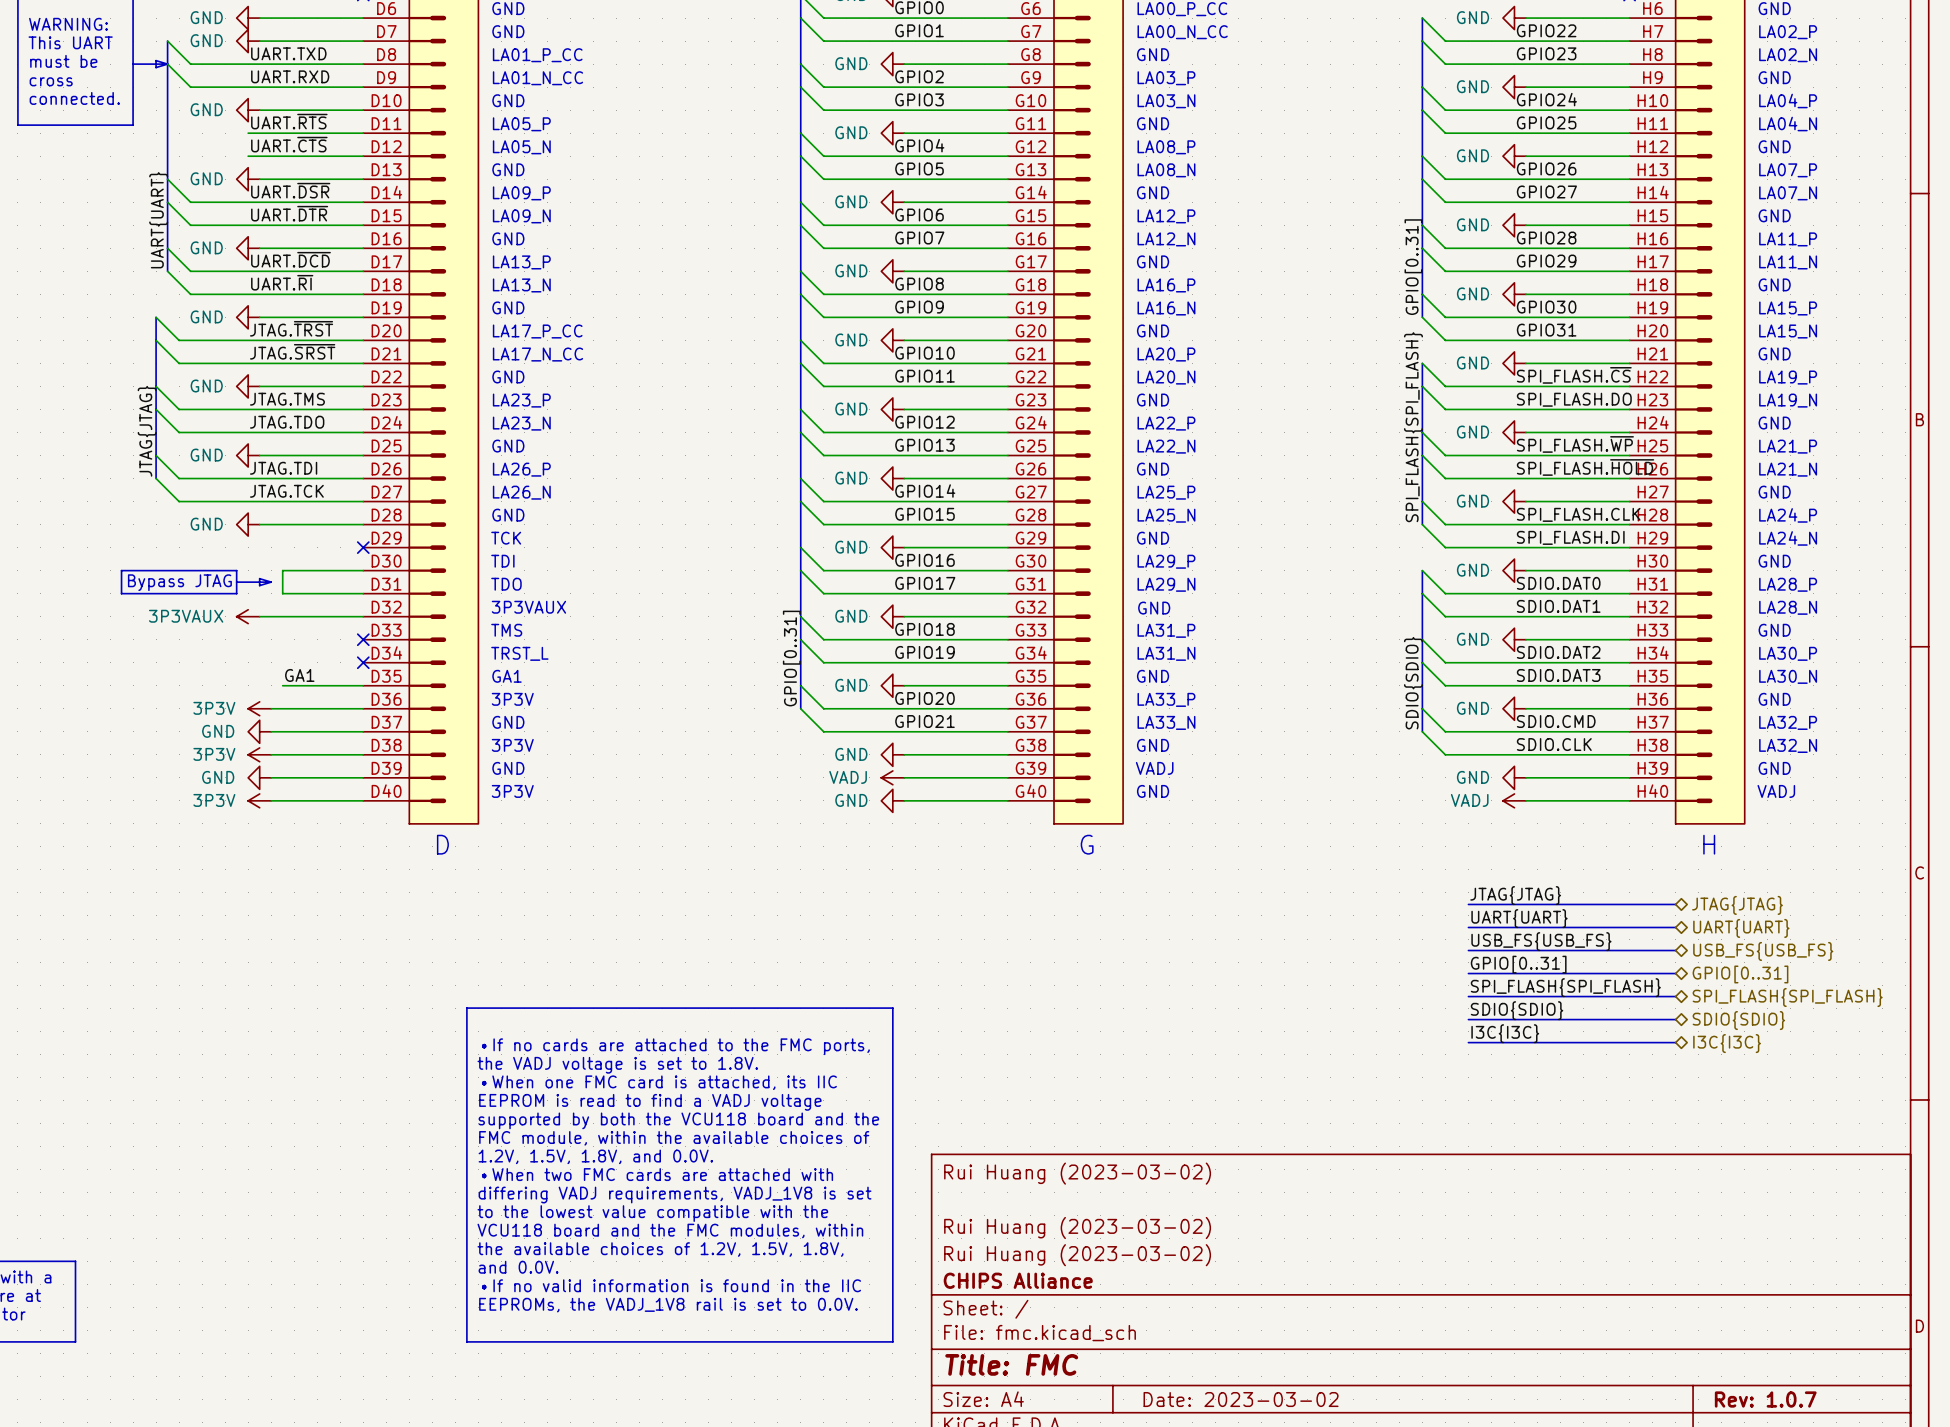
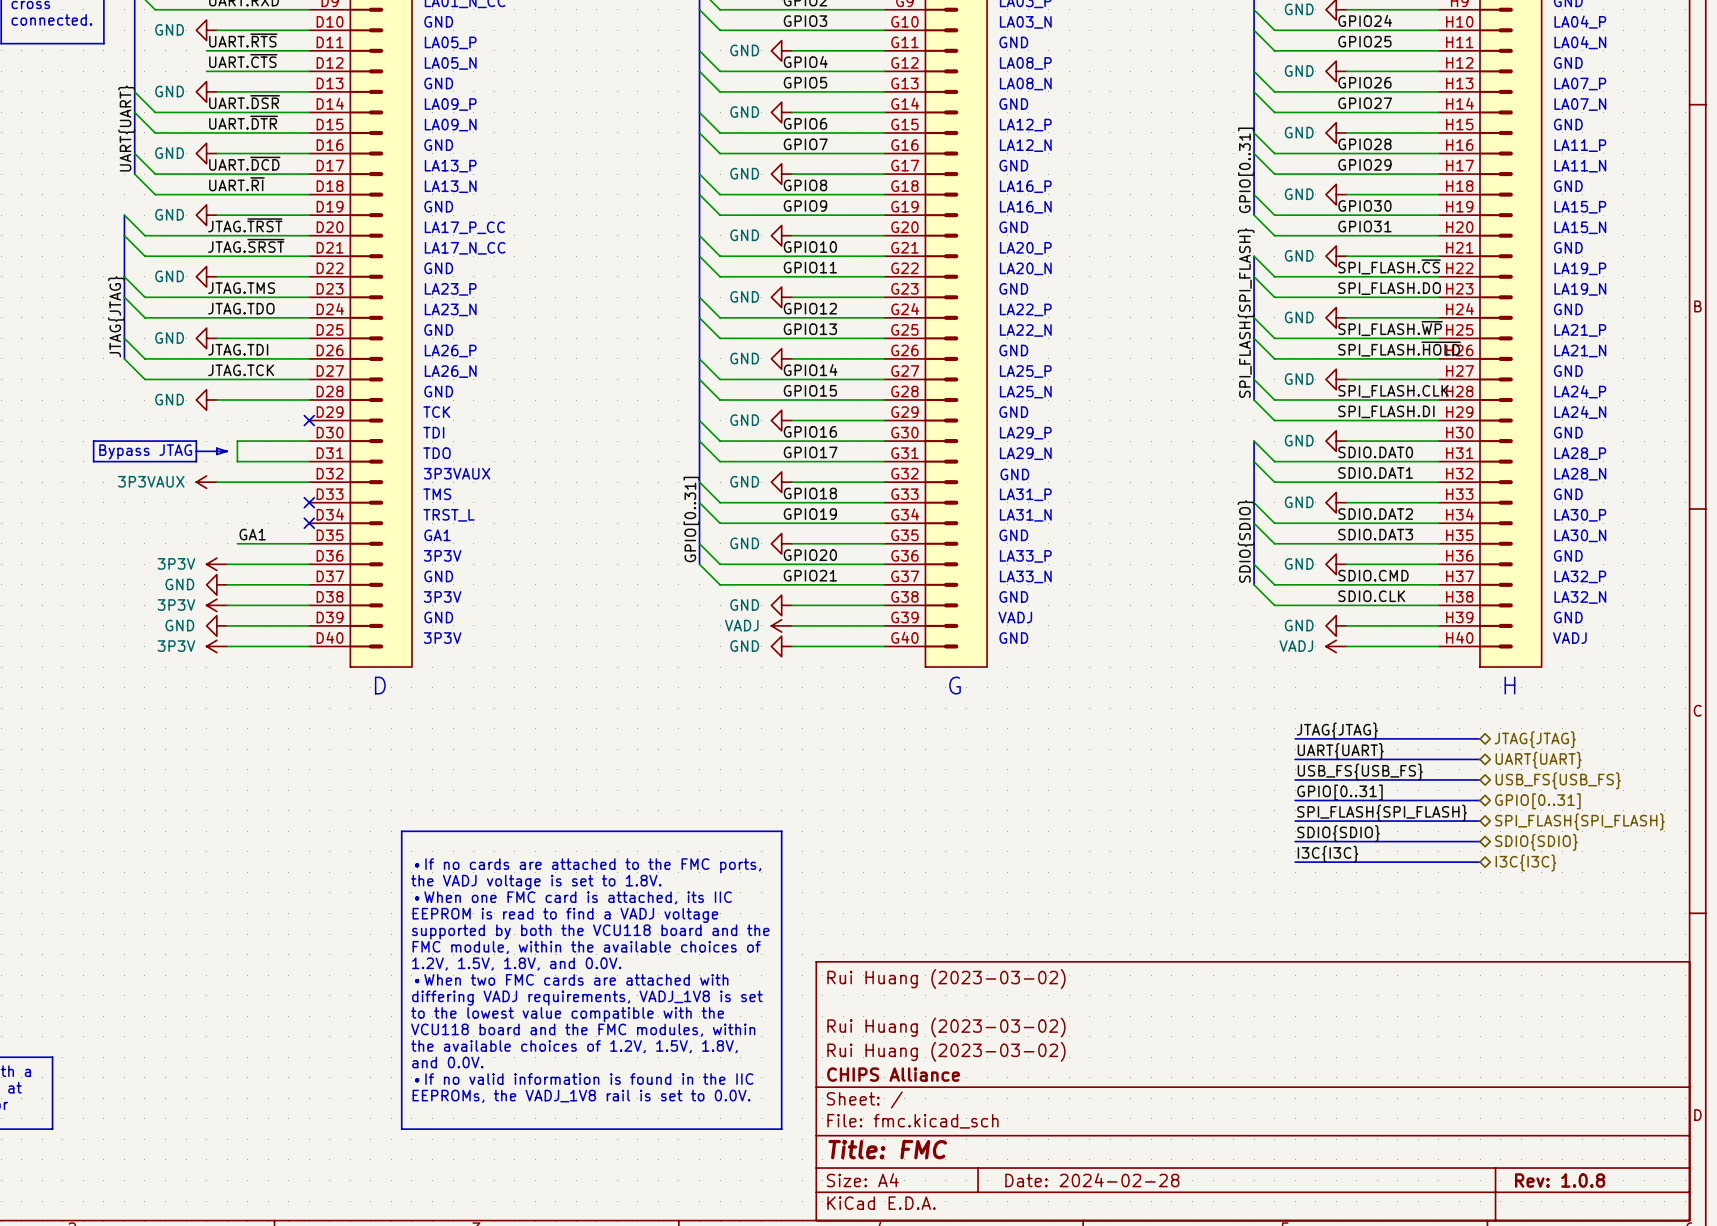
title block: Date: 2023-03-02 (1241, 1399) -> Date: 2024-02-28 (1092, 1180)
title block: Rev: 1.0.7 (1765, 1399) -> Rev: 1.0.8 (1560, 1180)

